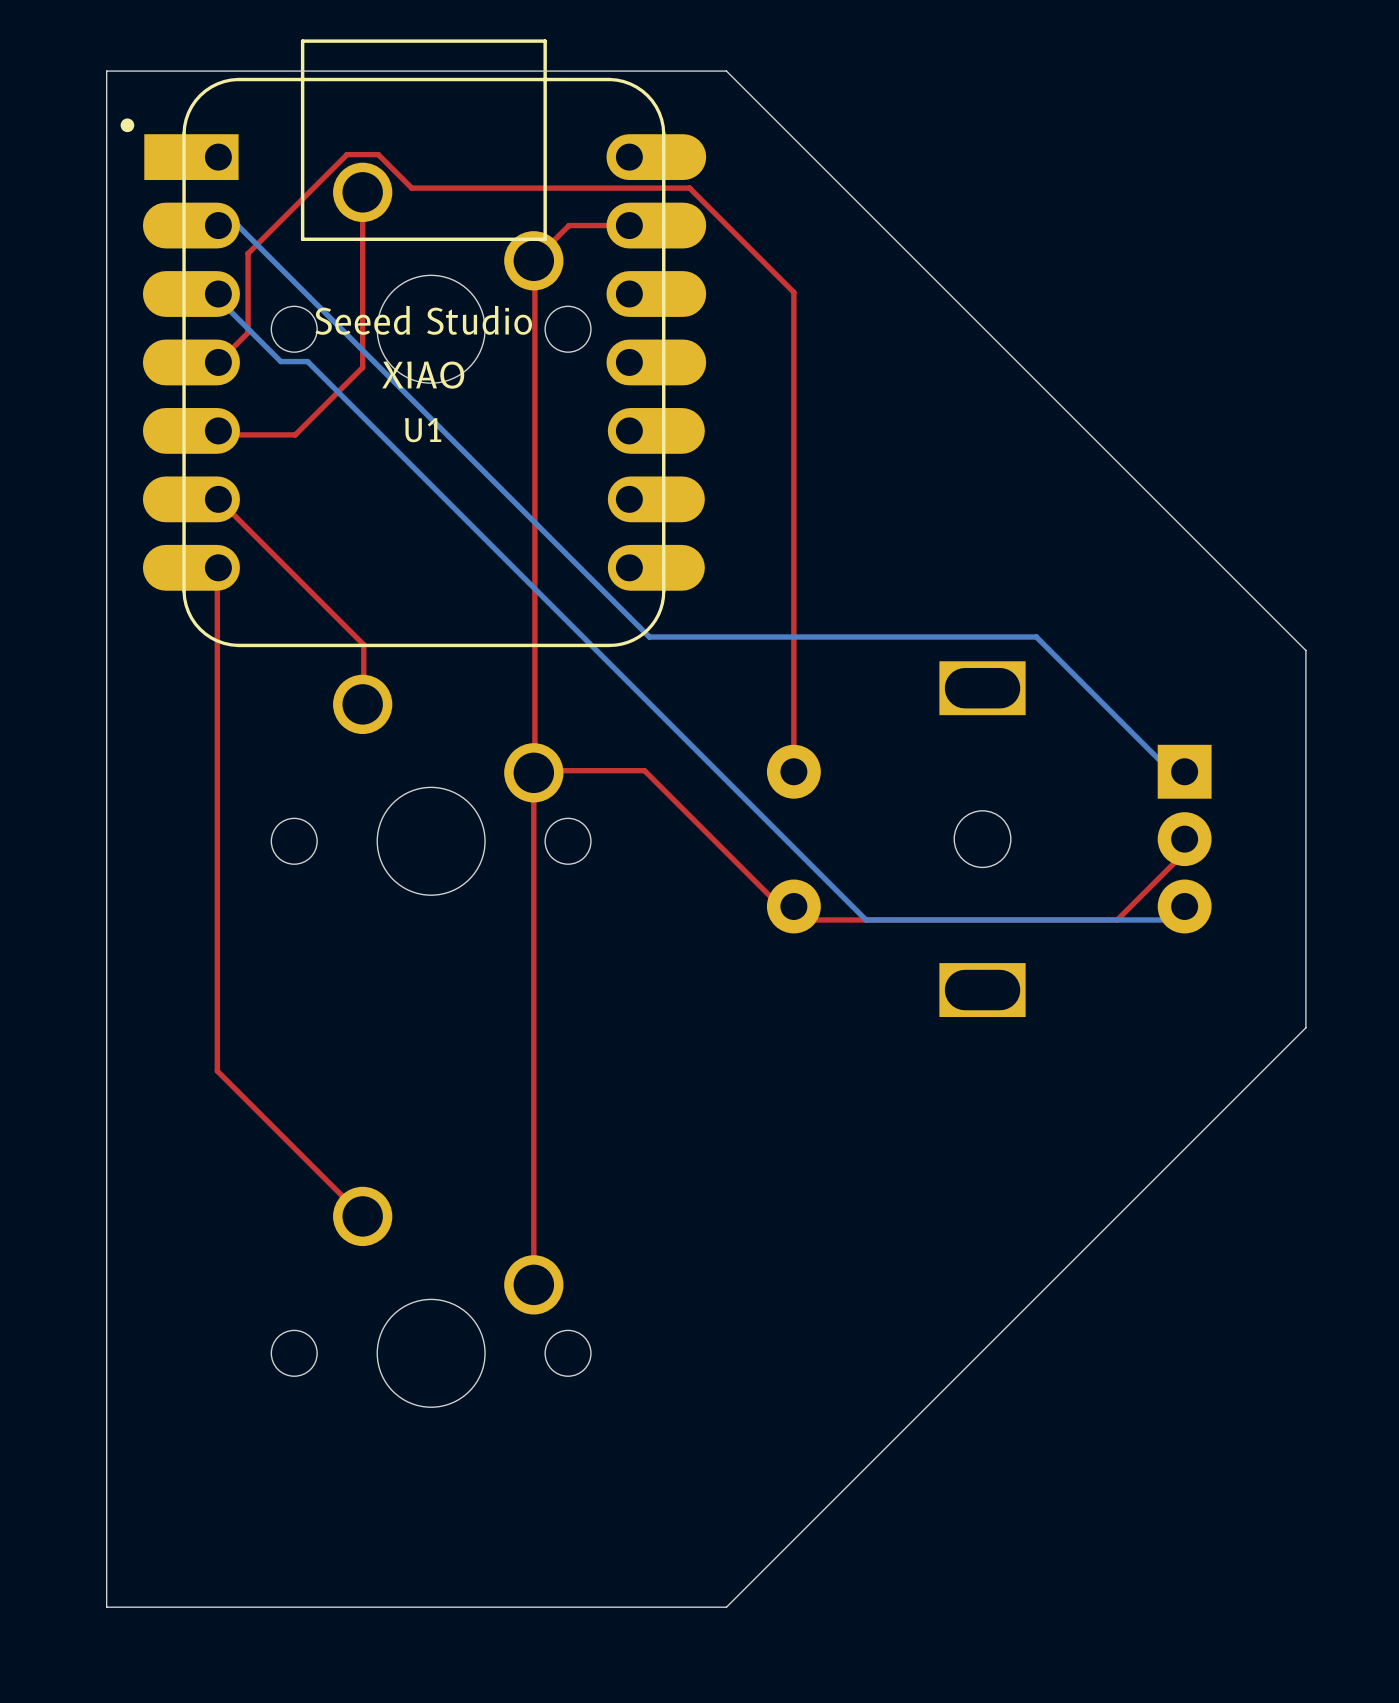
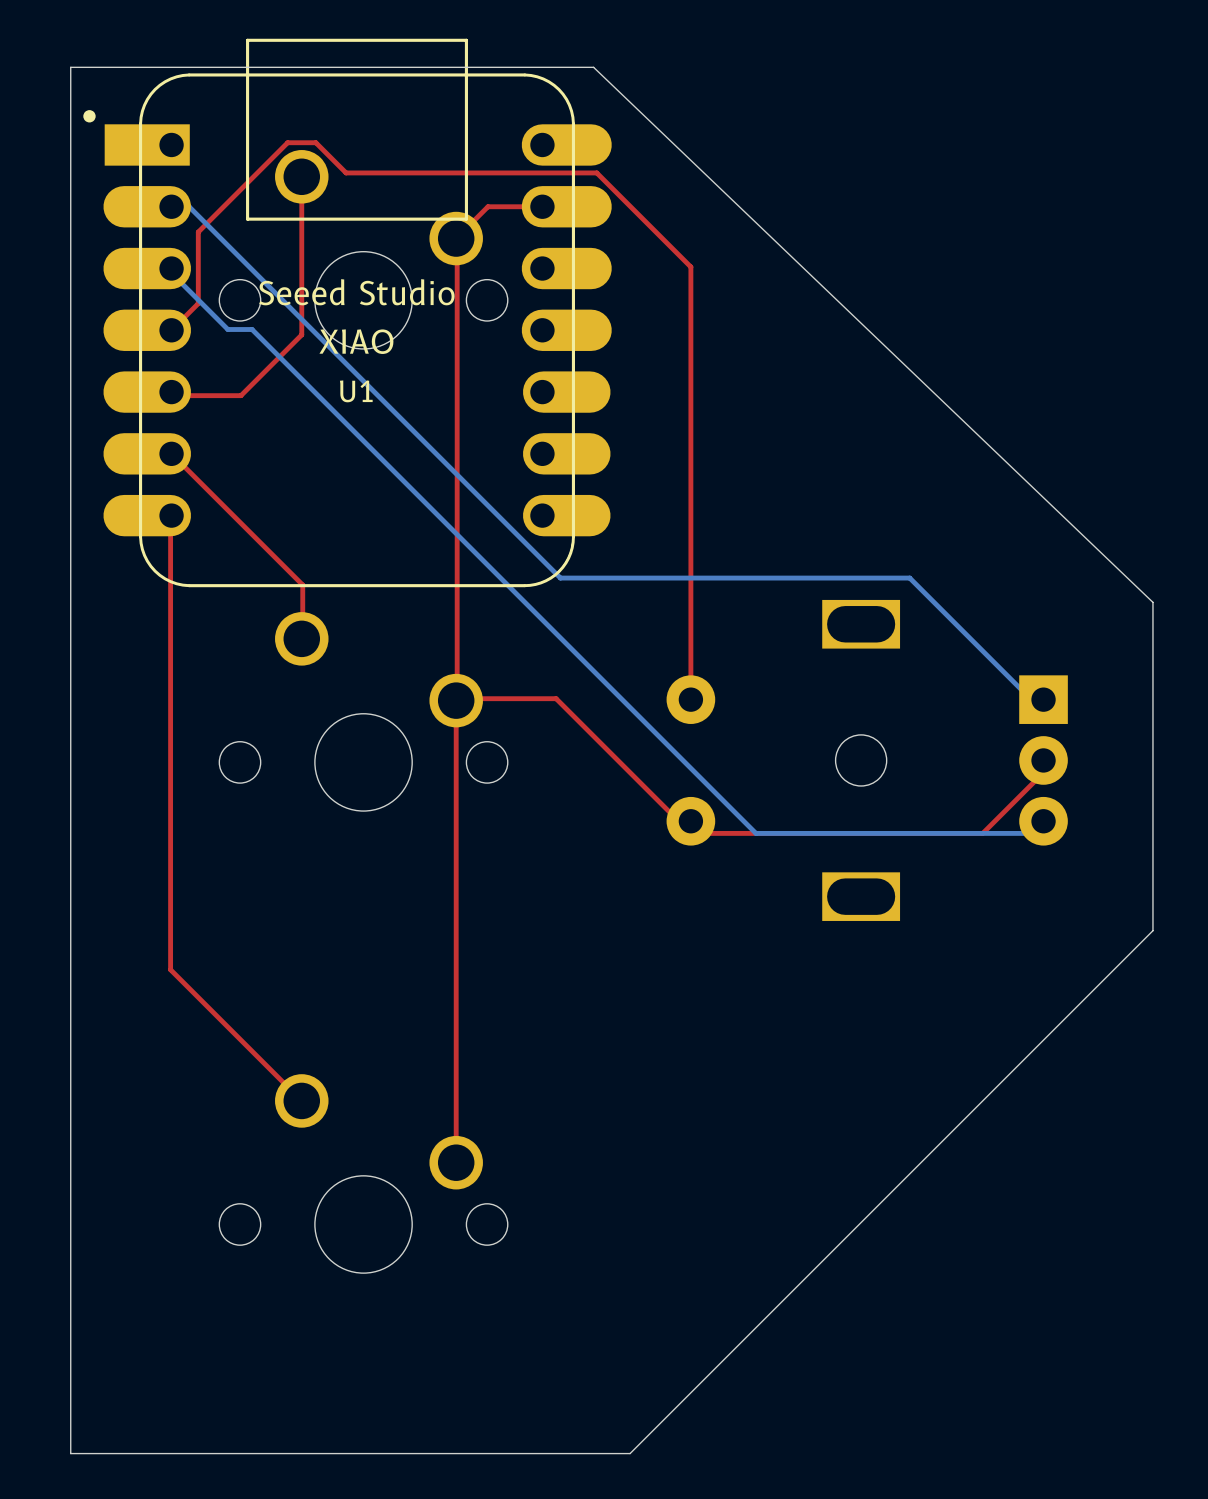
board edge: (686, 71) (726, 71) (1305, 650) (1305, 663) -> (593, 67) (1152, 602)

